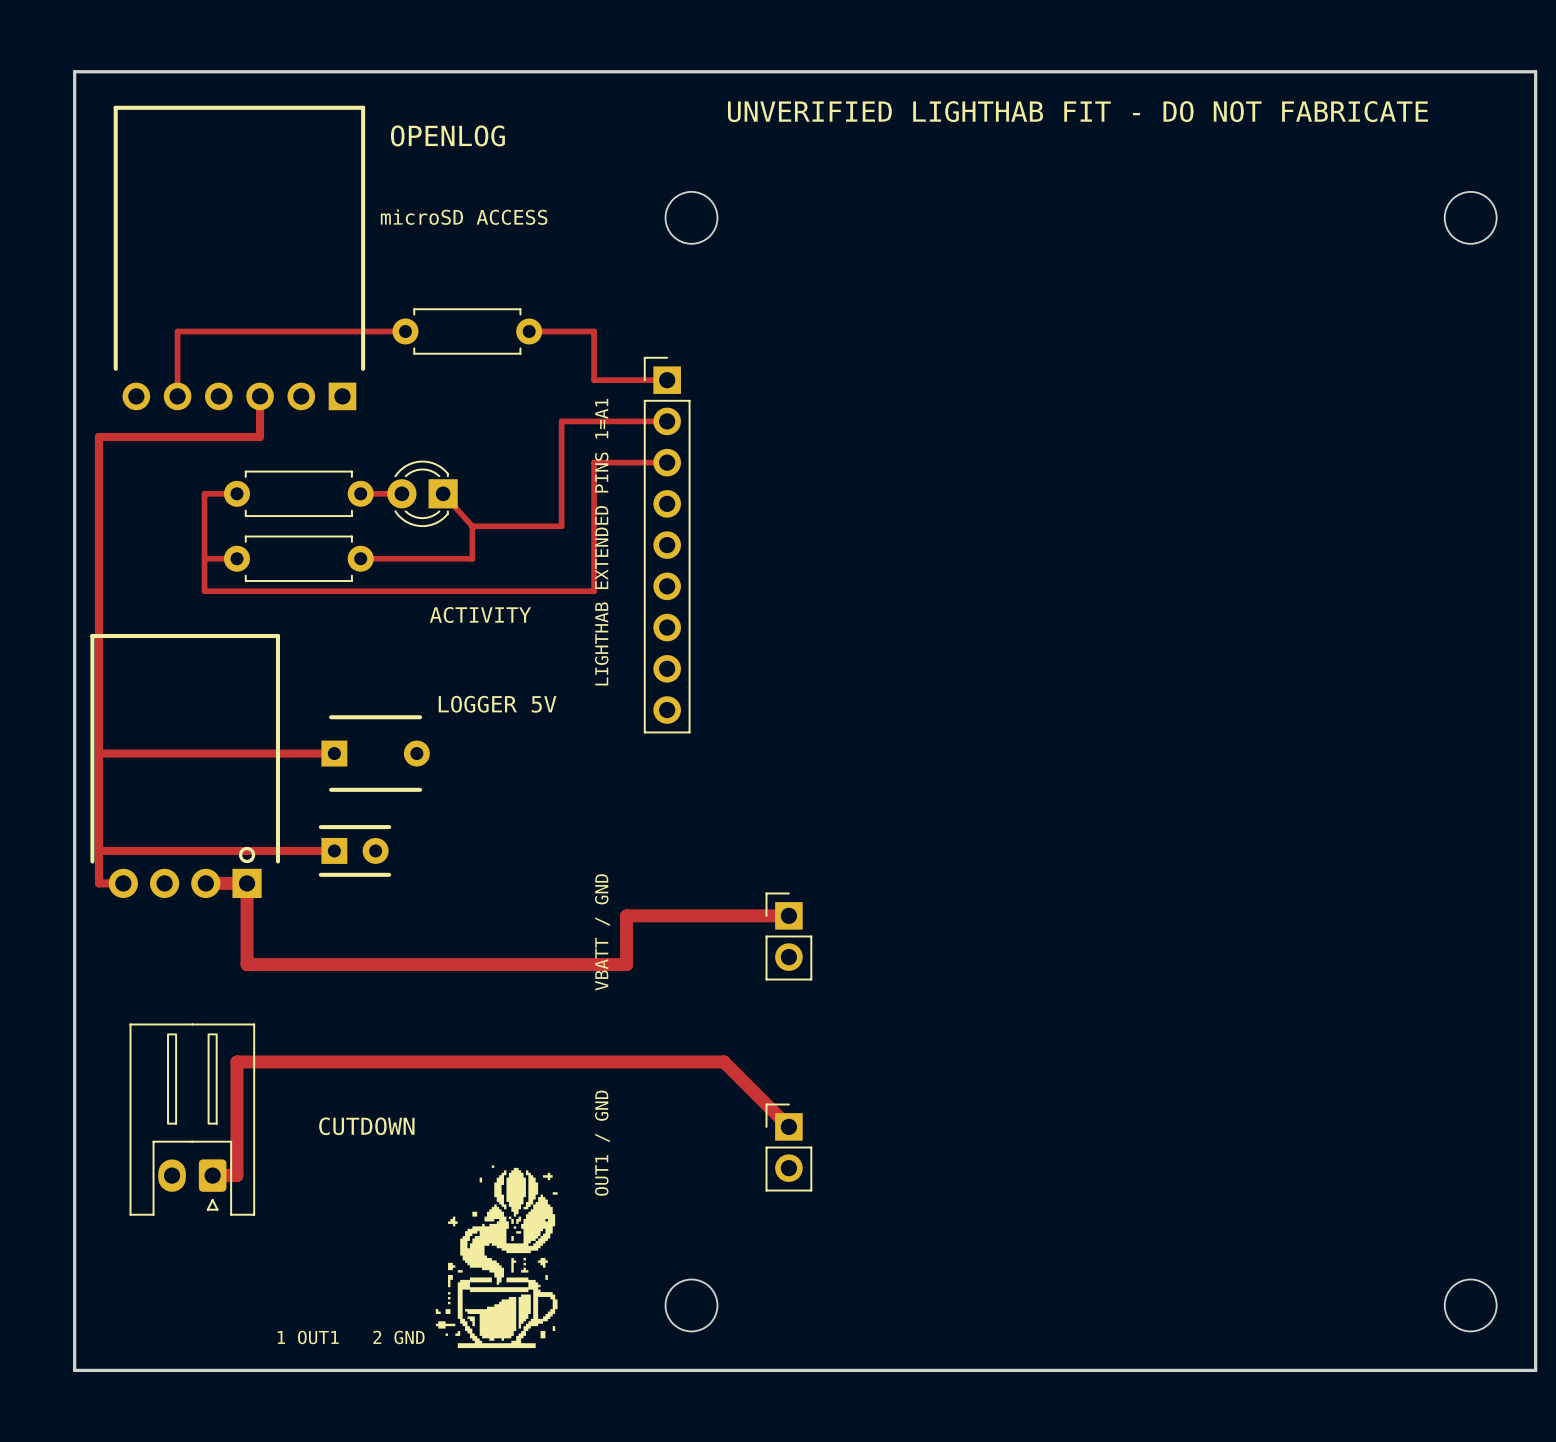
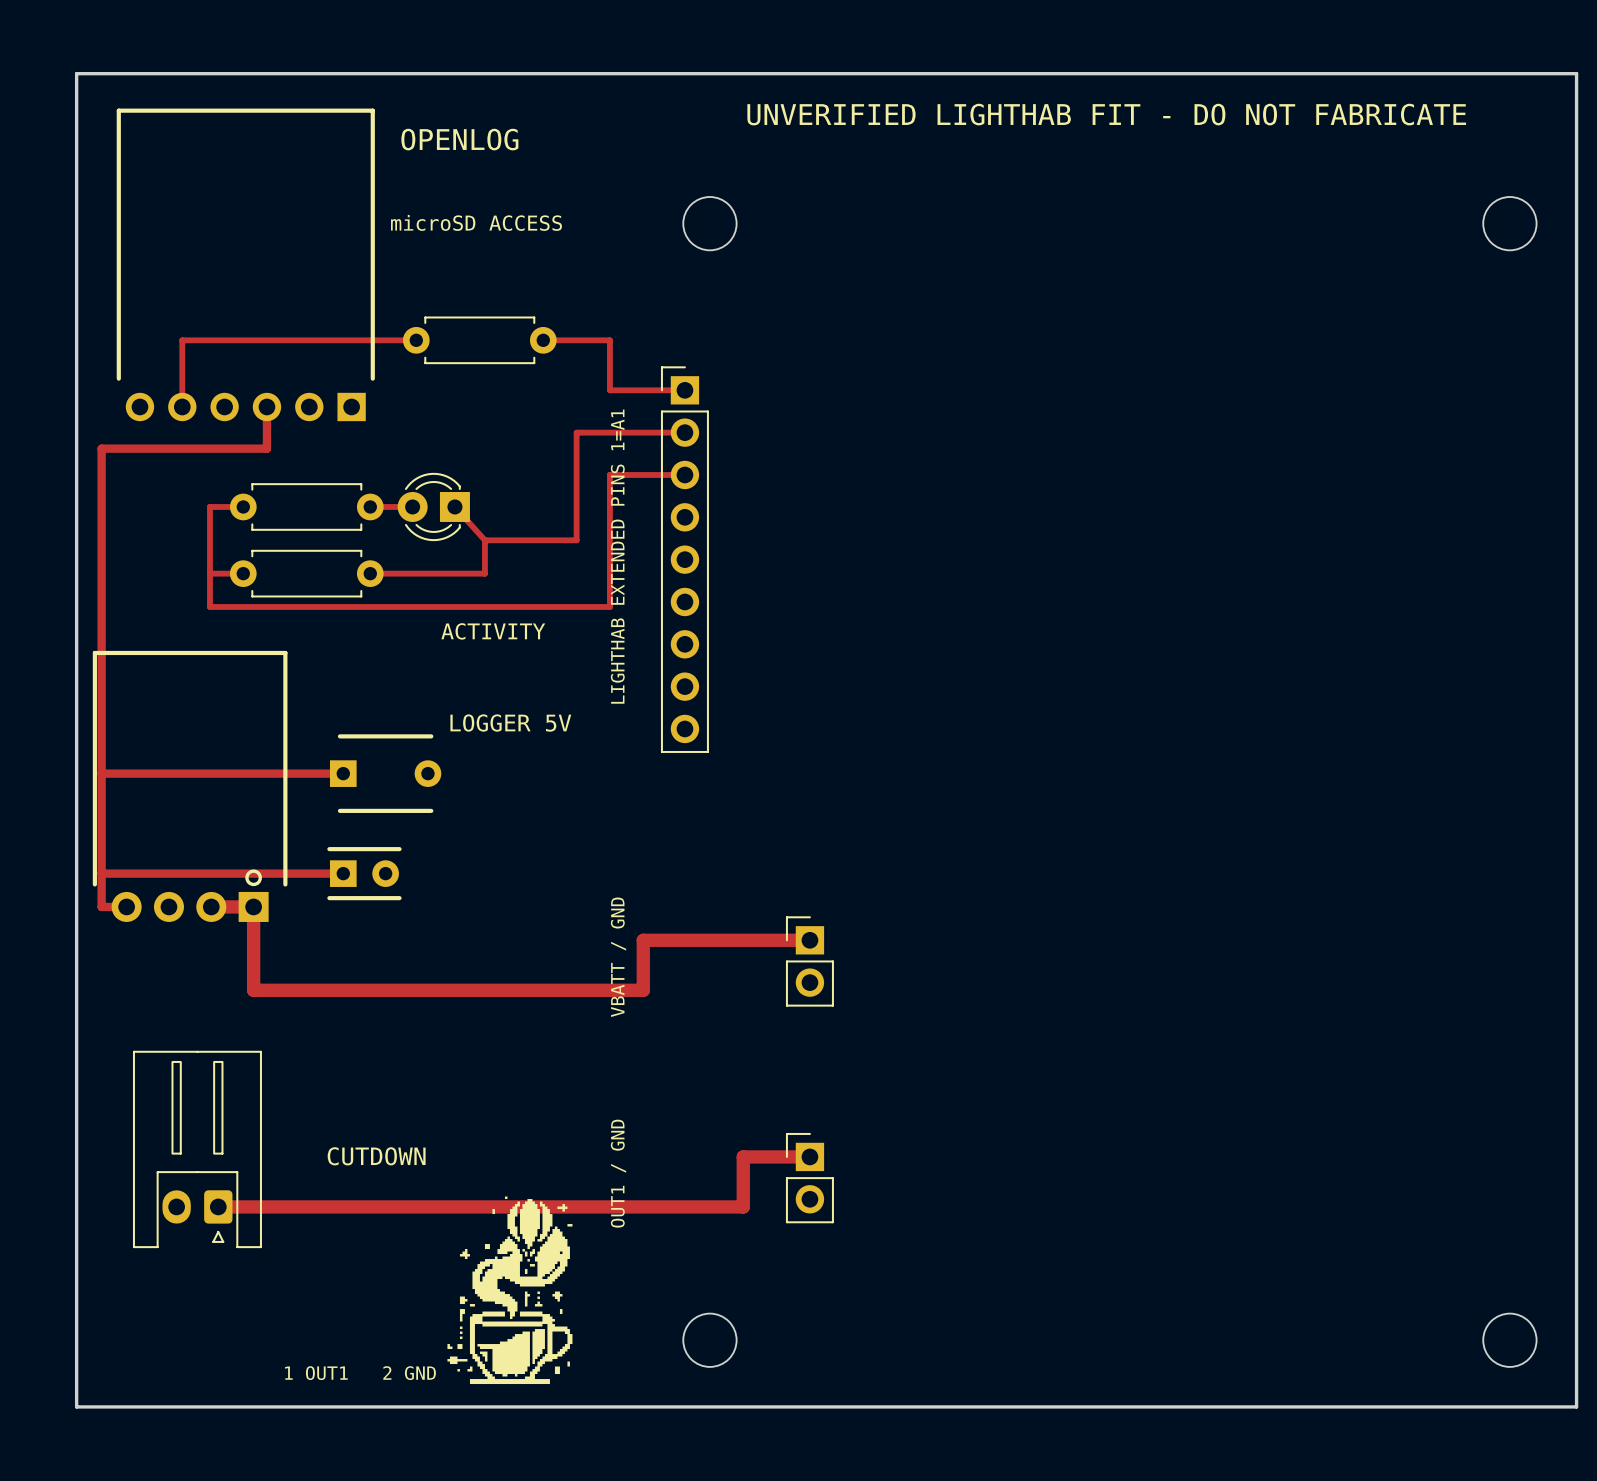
track: (788, 1126) (723, 1061) (236, 1061) (236, 1175) -> (809, 1156) (743, 1156) (743, 1206) (243, 1206)

